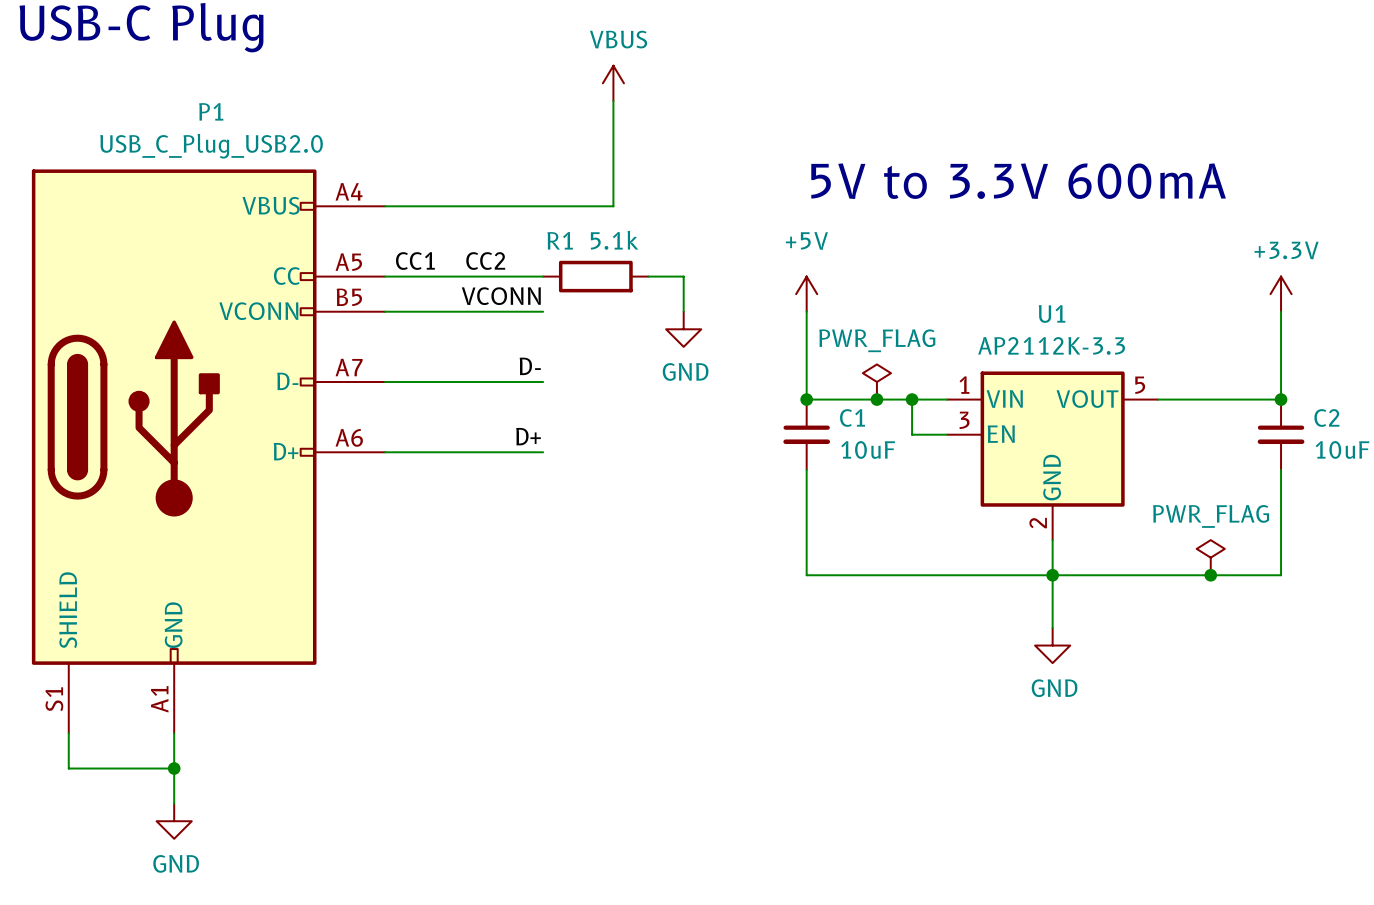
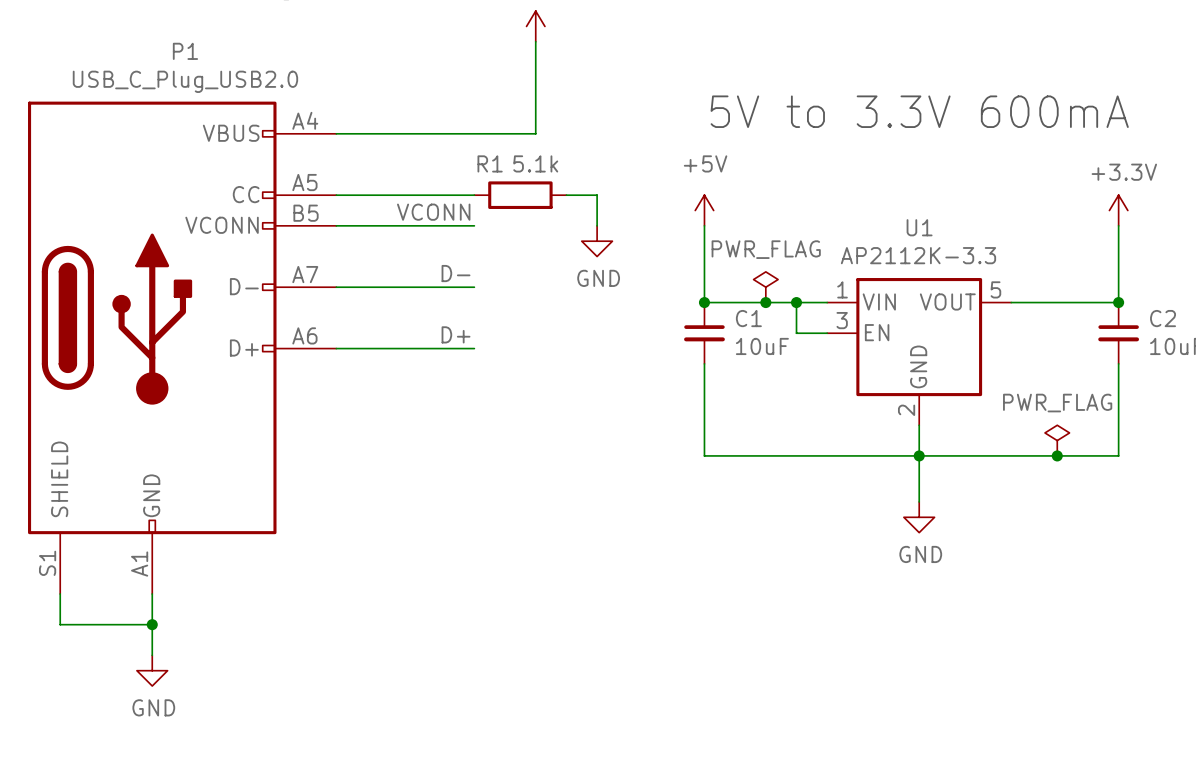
label: CC1 (415, 261) -> none
label: CC2 (485, 261) -> none

